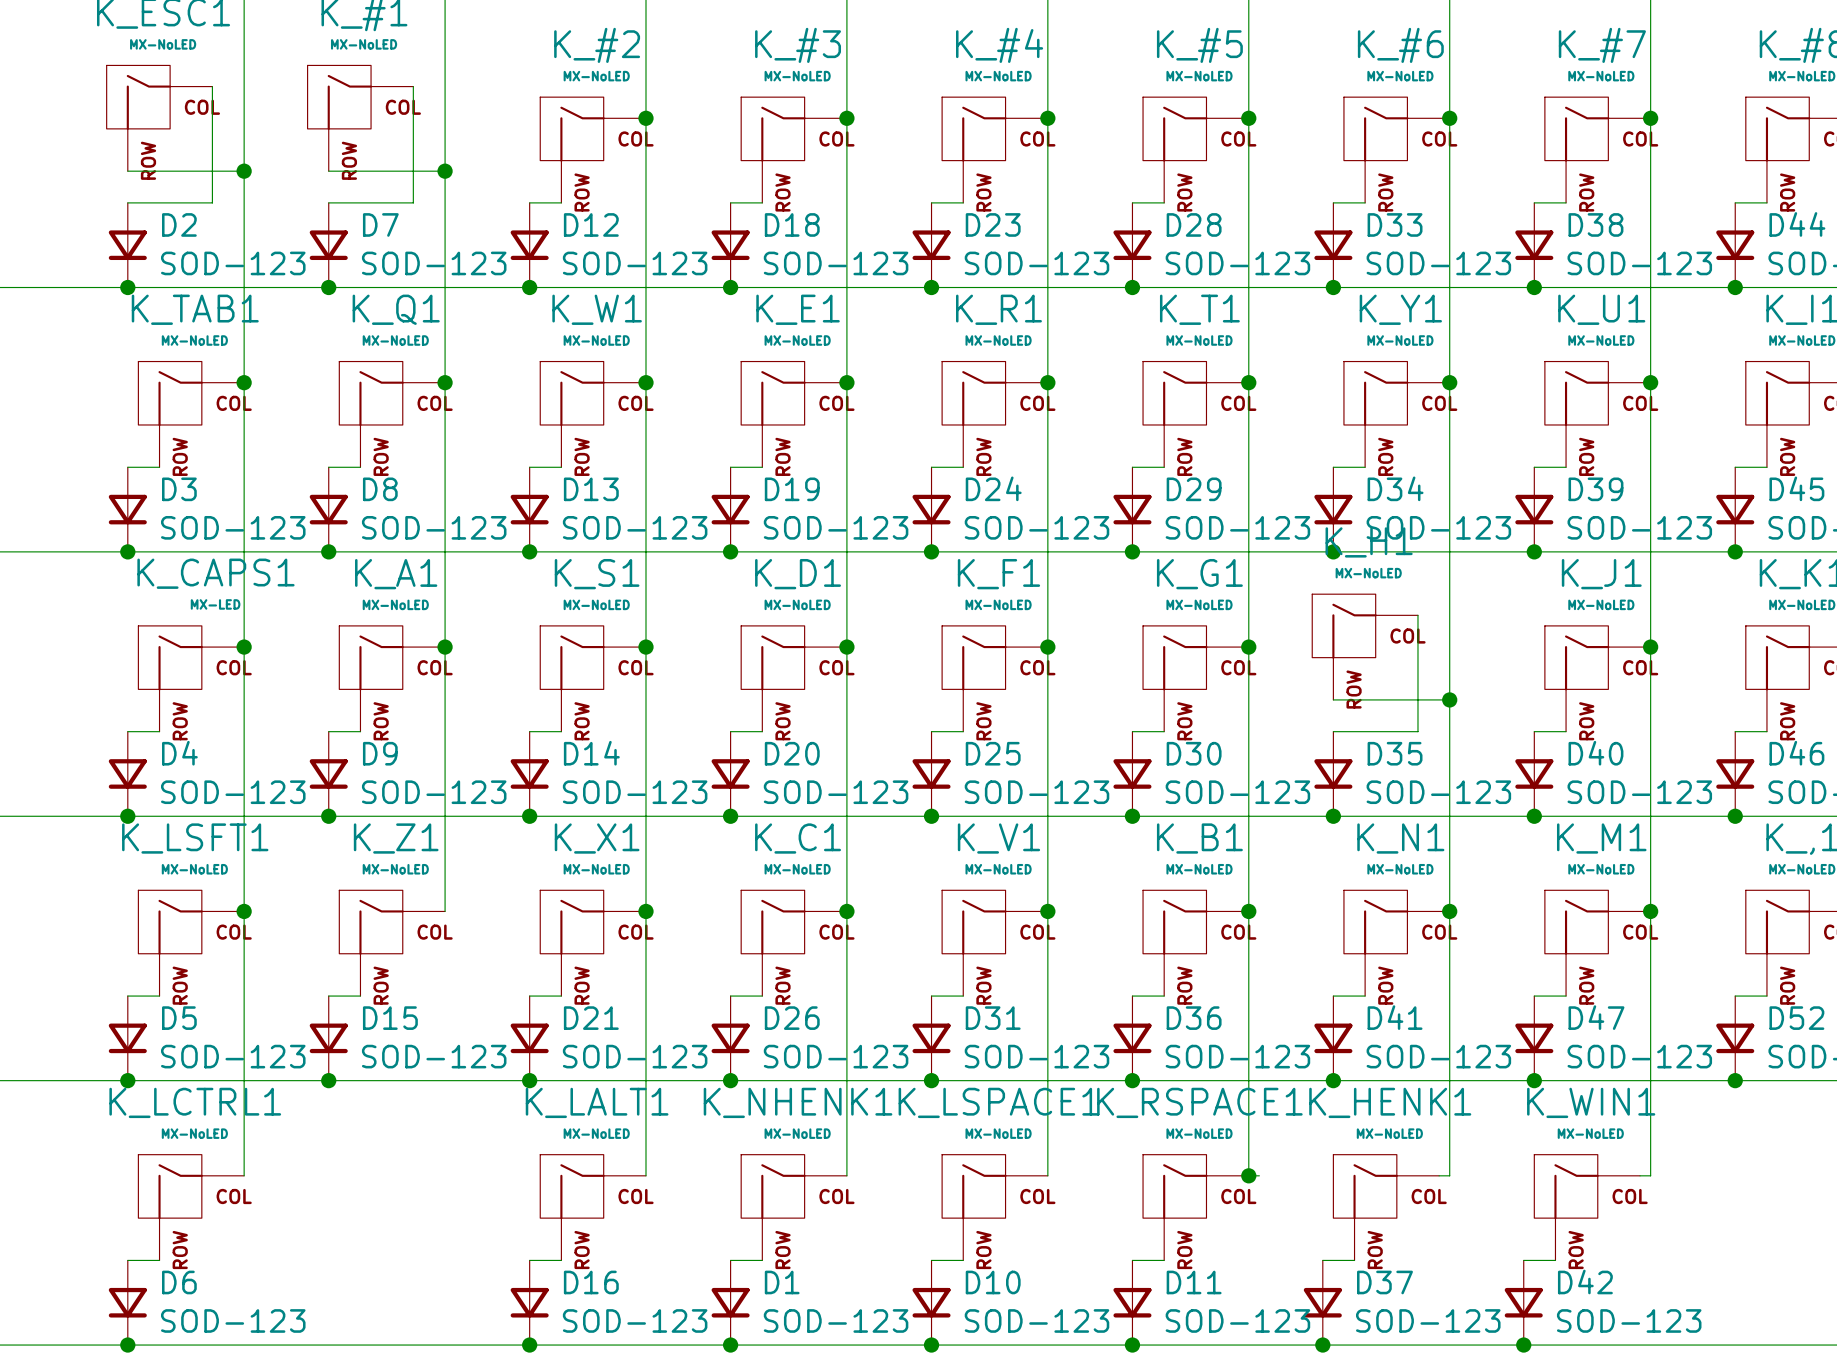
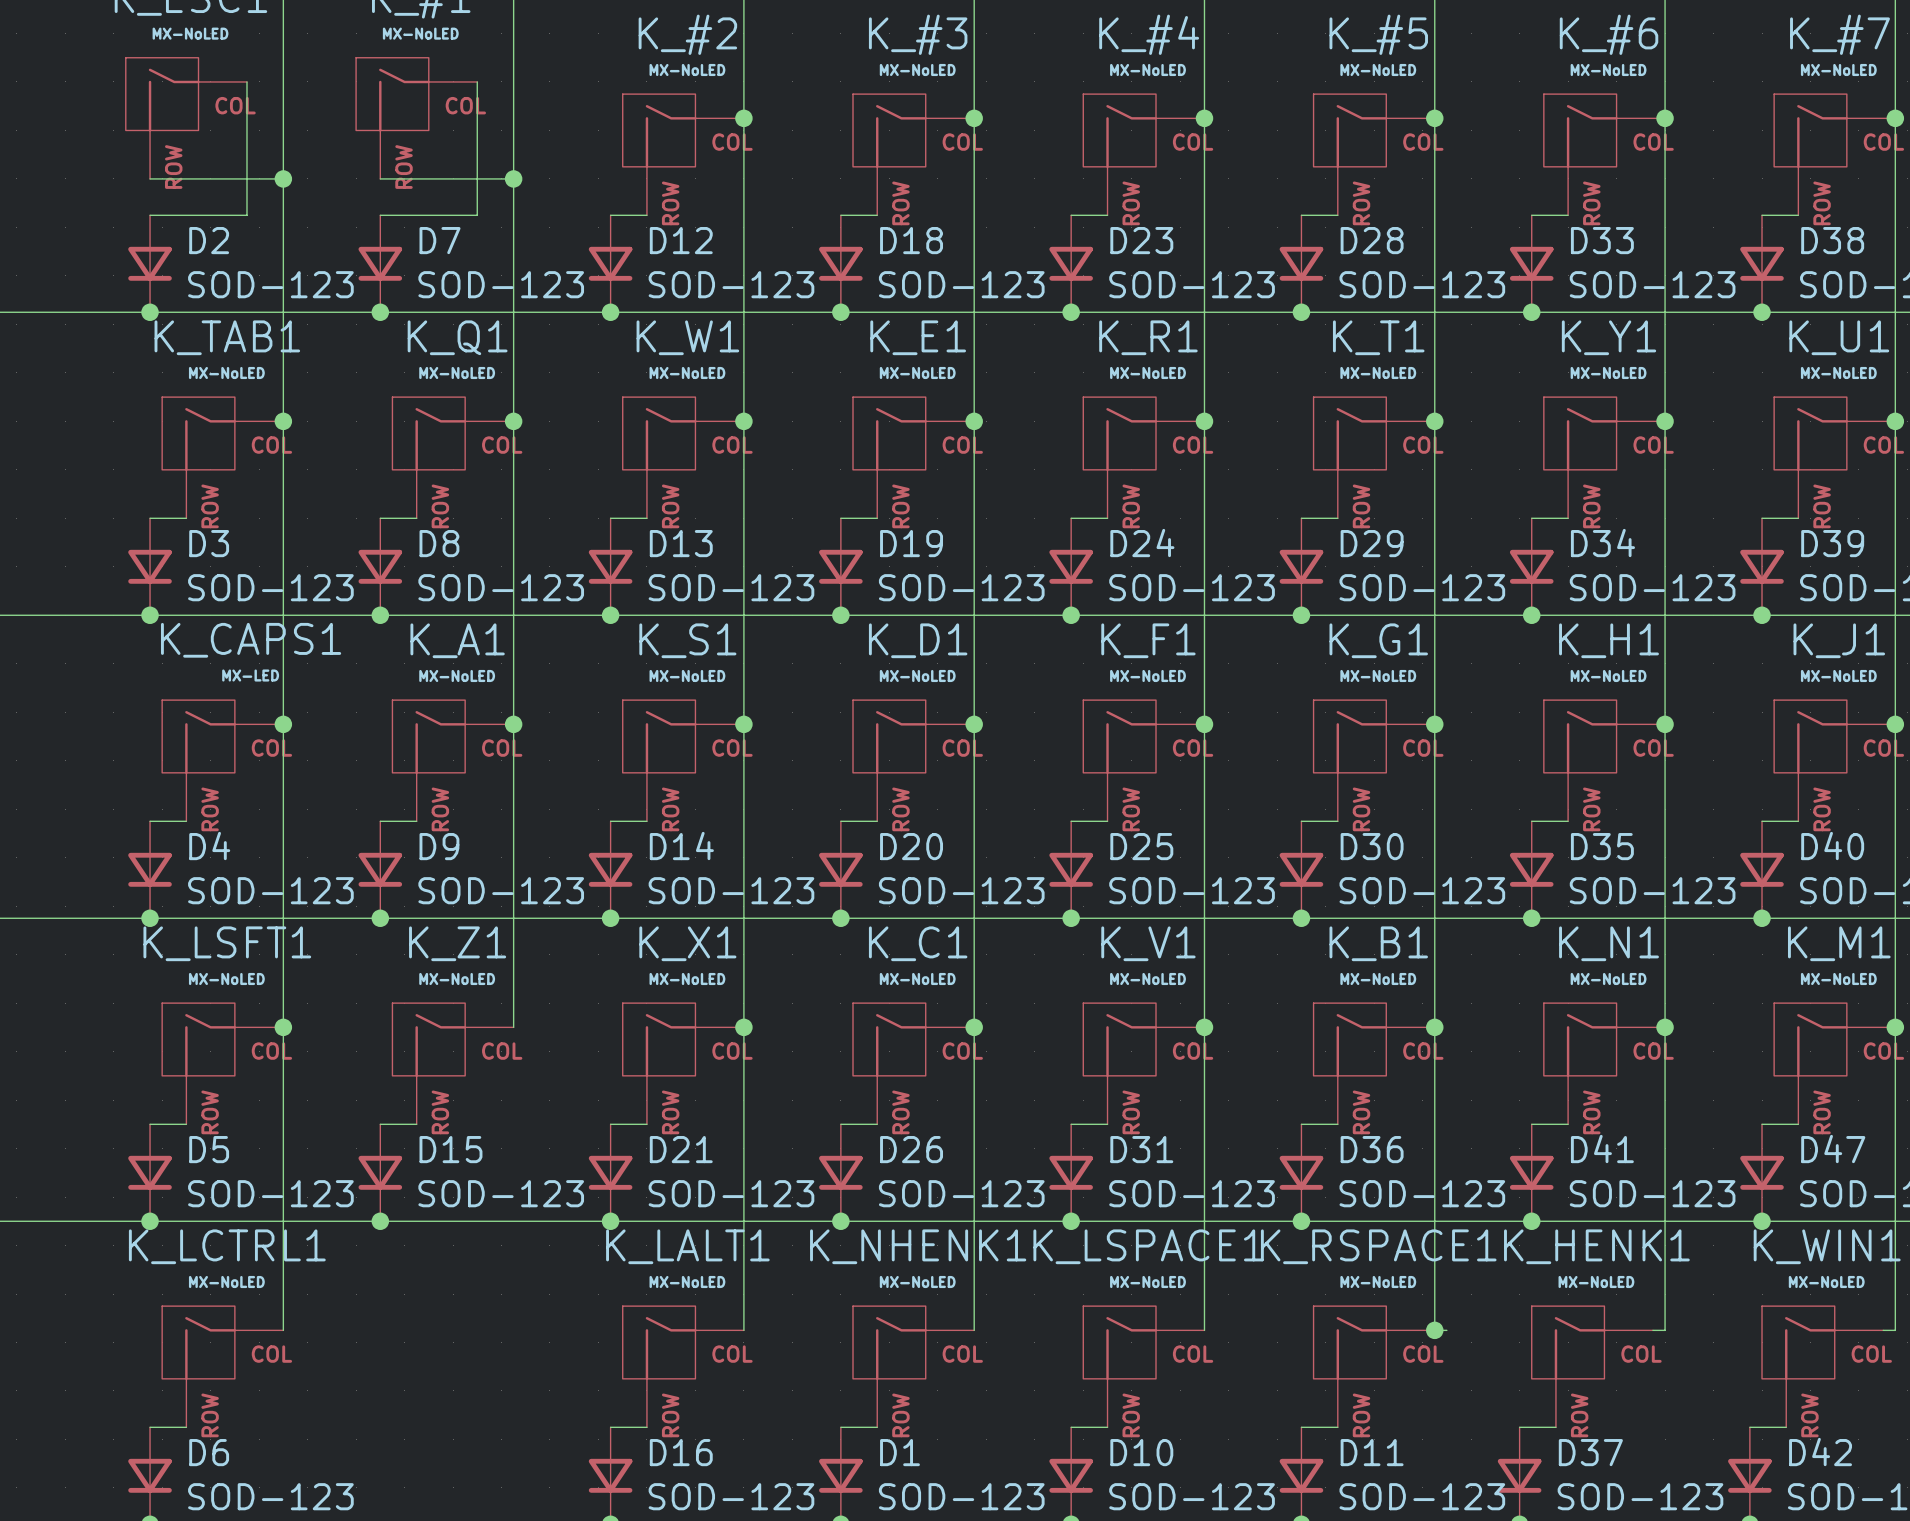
wire: (1417, 615) (1417, 731) (1365, 731) -> none
K_H1 position: (1365, 647) -> (1604, 760)
wire: (1333, 699) (1449, 699) -> none
junction position: (1449, 699) -> (1665, 724)

